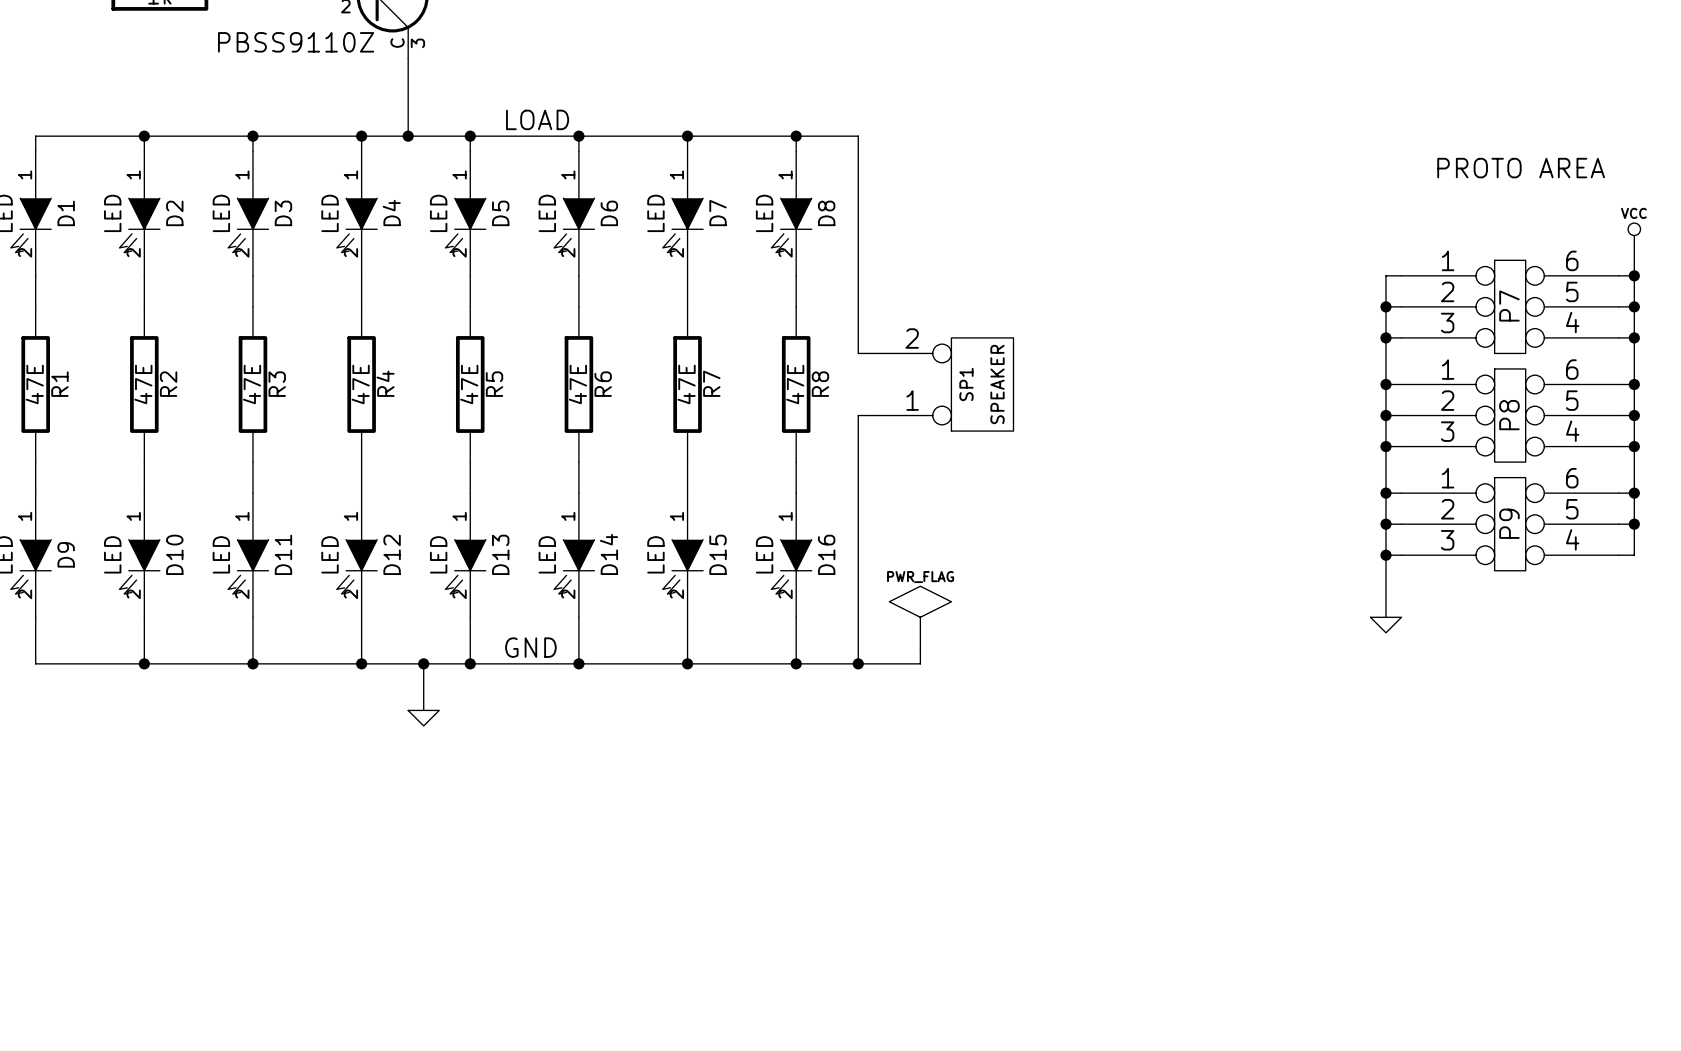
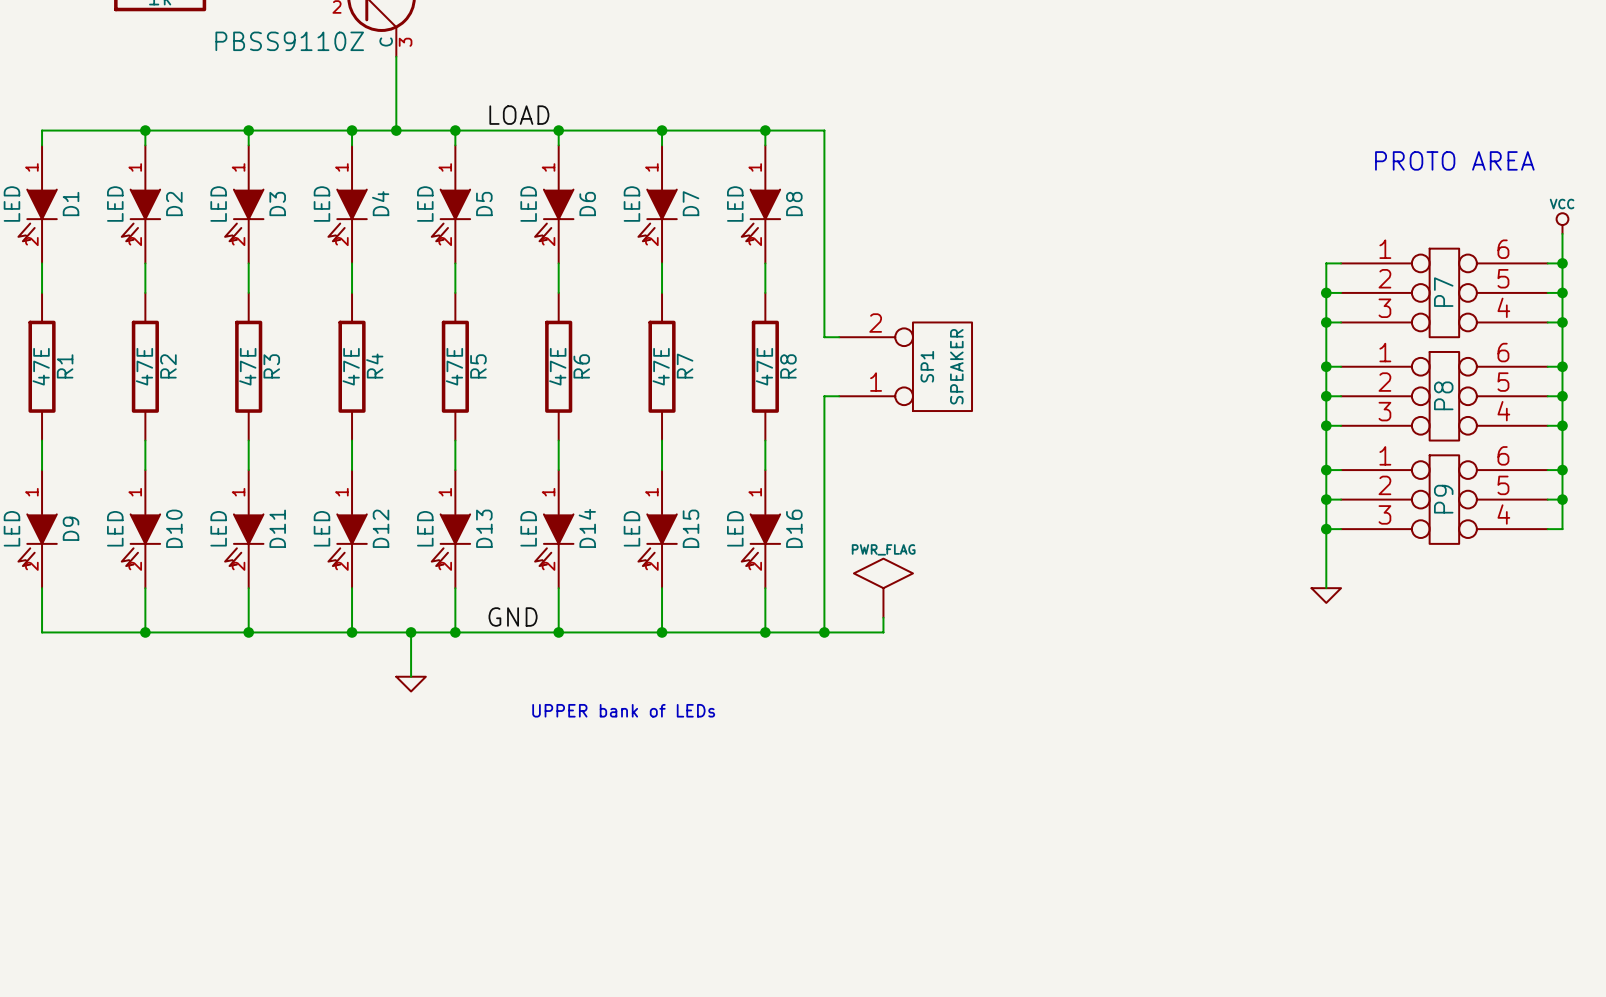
text: none -> UPPER bank of LEDs (623, 710)

